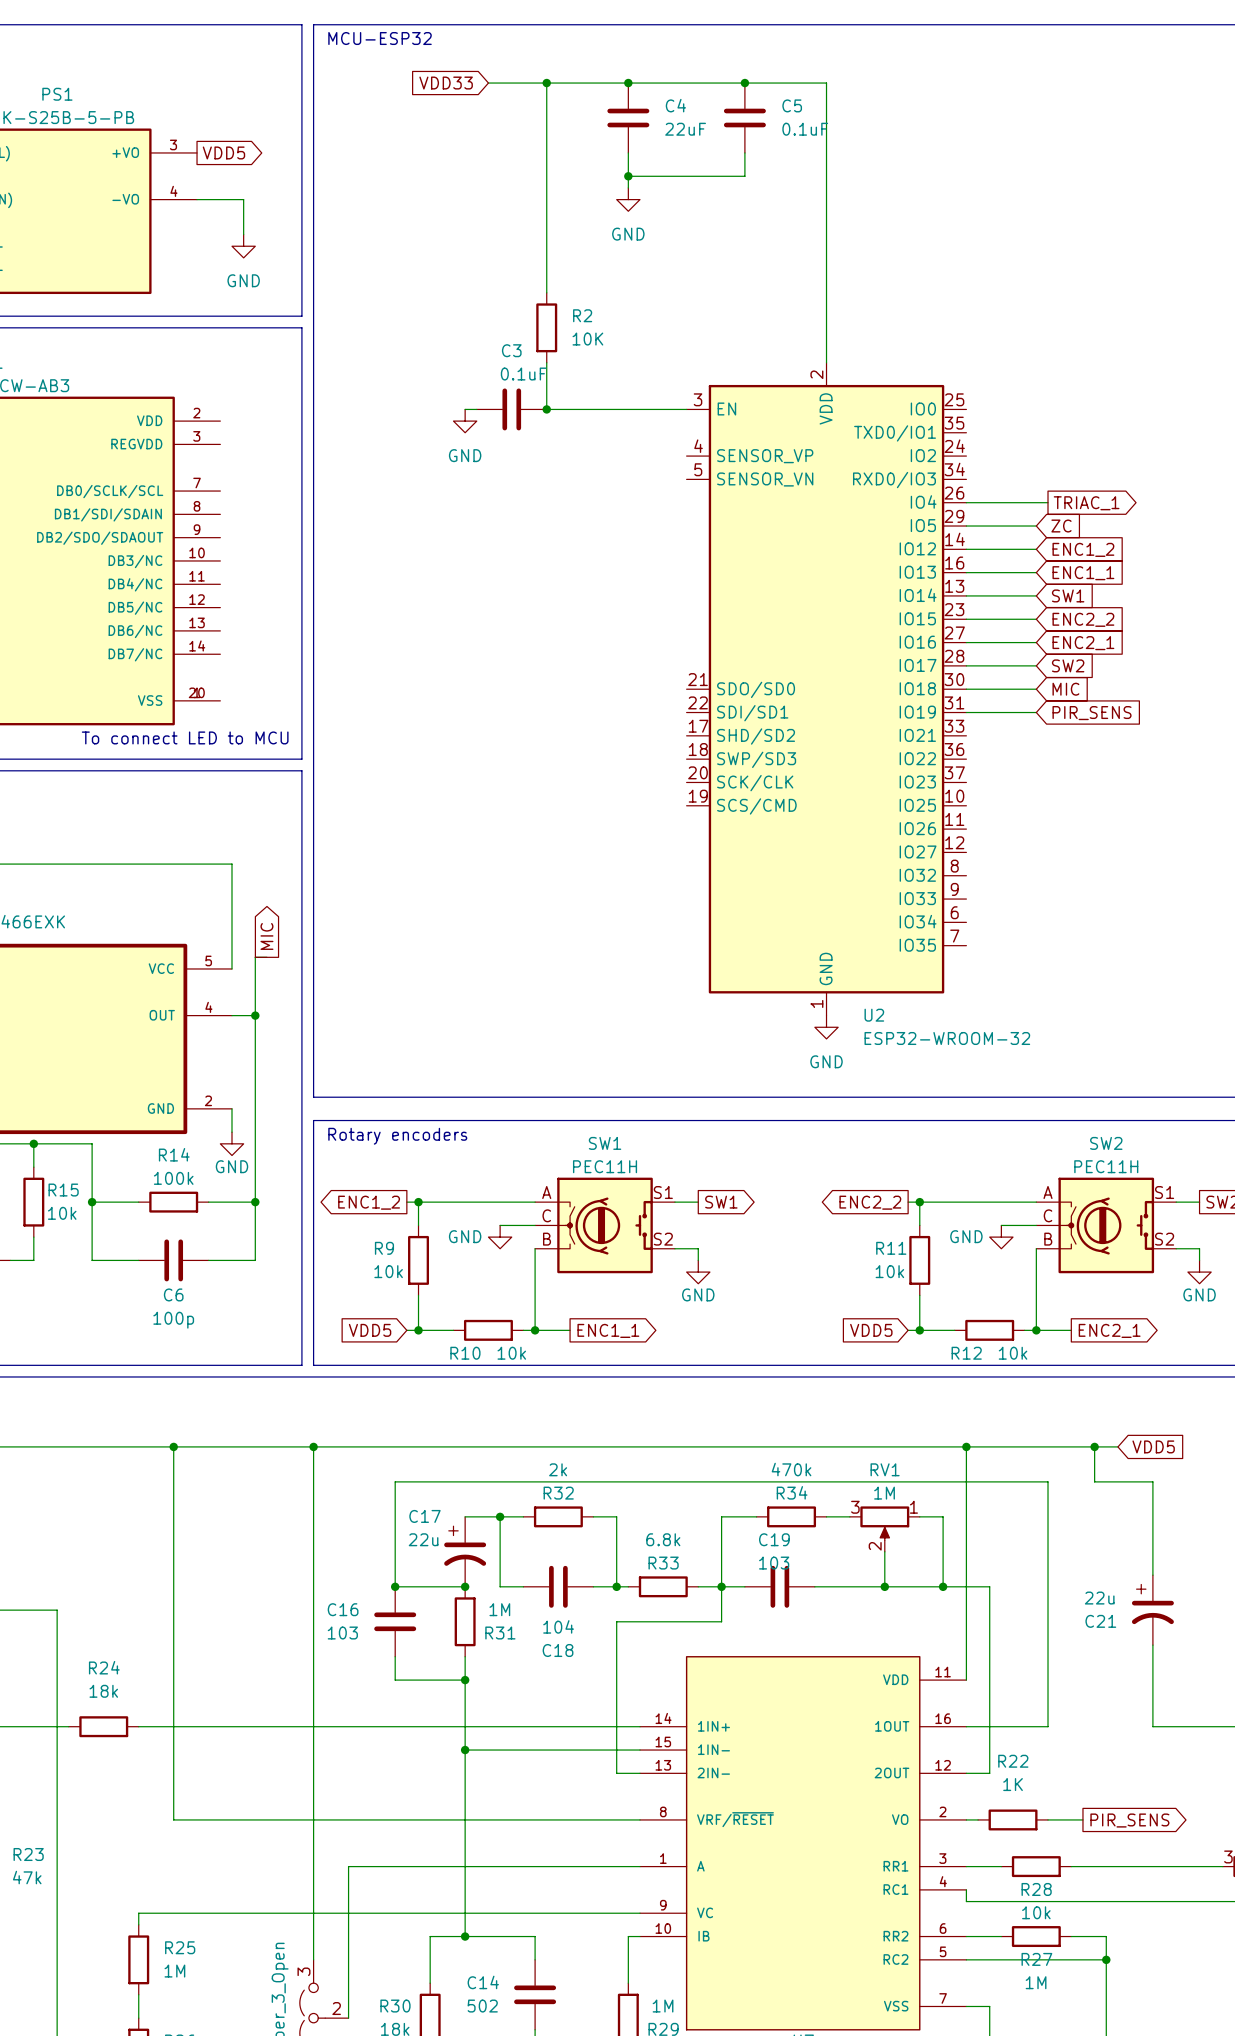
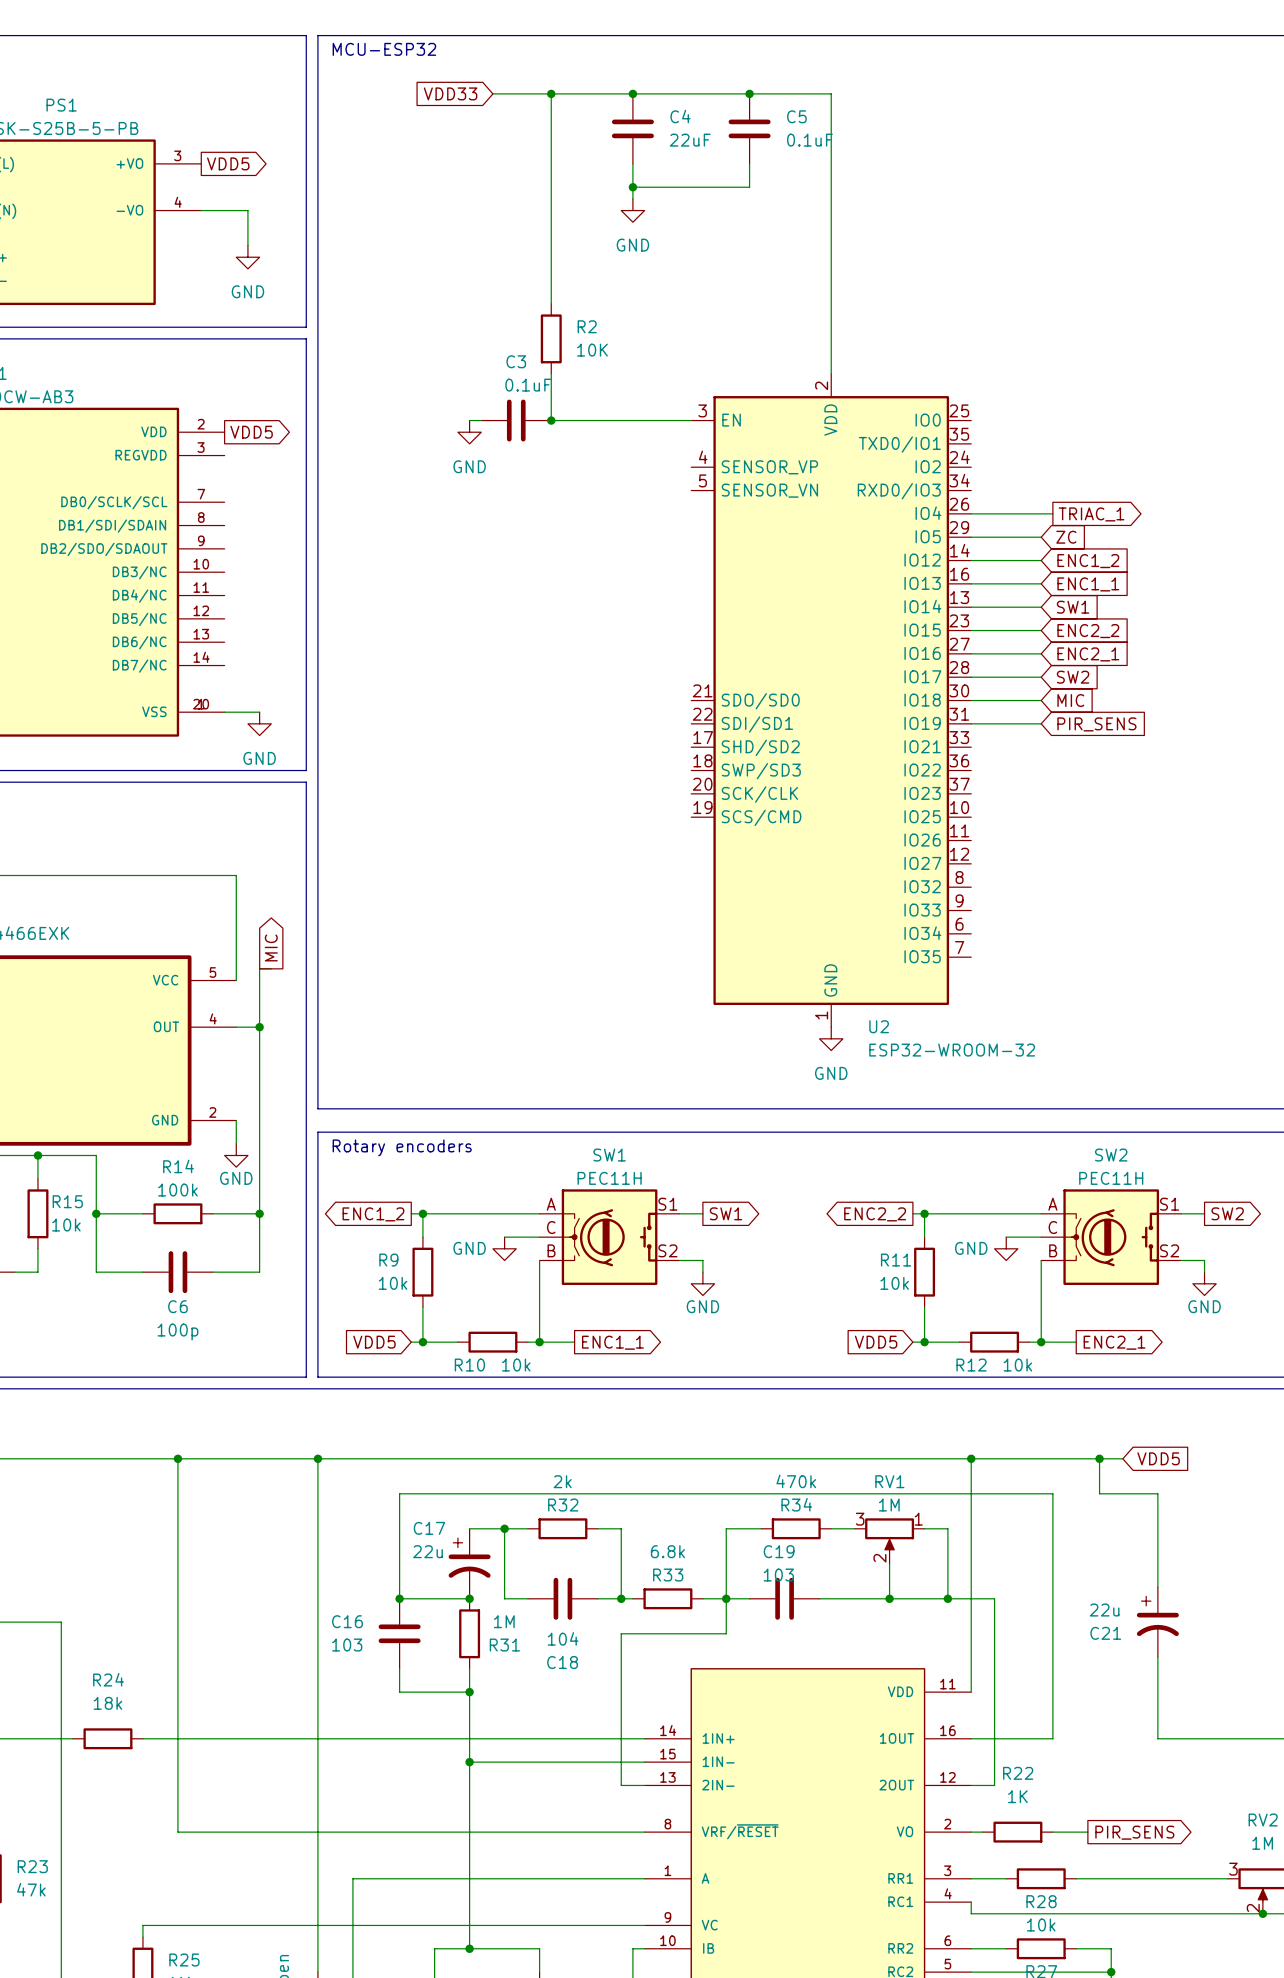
global label: none -> VDD5 (251, 432)
wire: none -> (224, 712) (259, 712)
power symbol: none -> GND (259, 723)
text: To connect LED to MCU (185, 737) -> none

